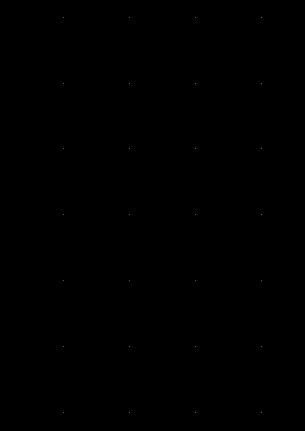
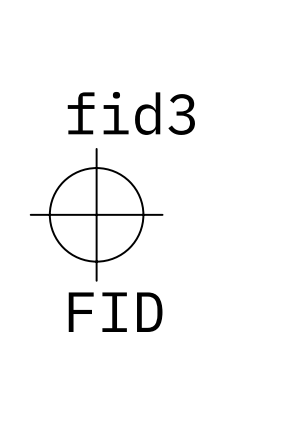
fid3: none -> FID (96, 214)

